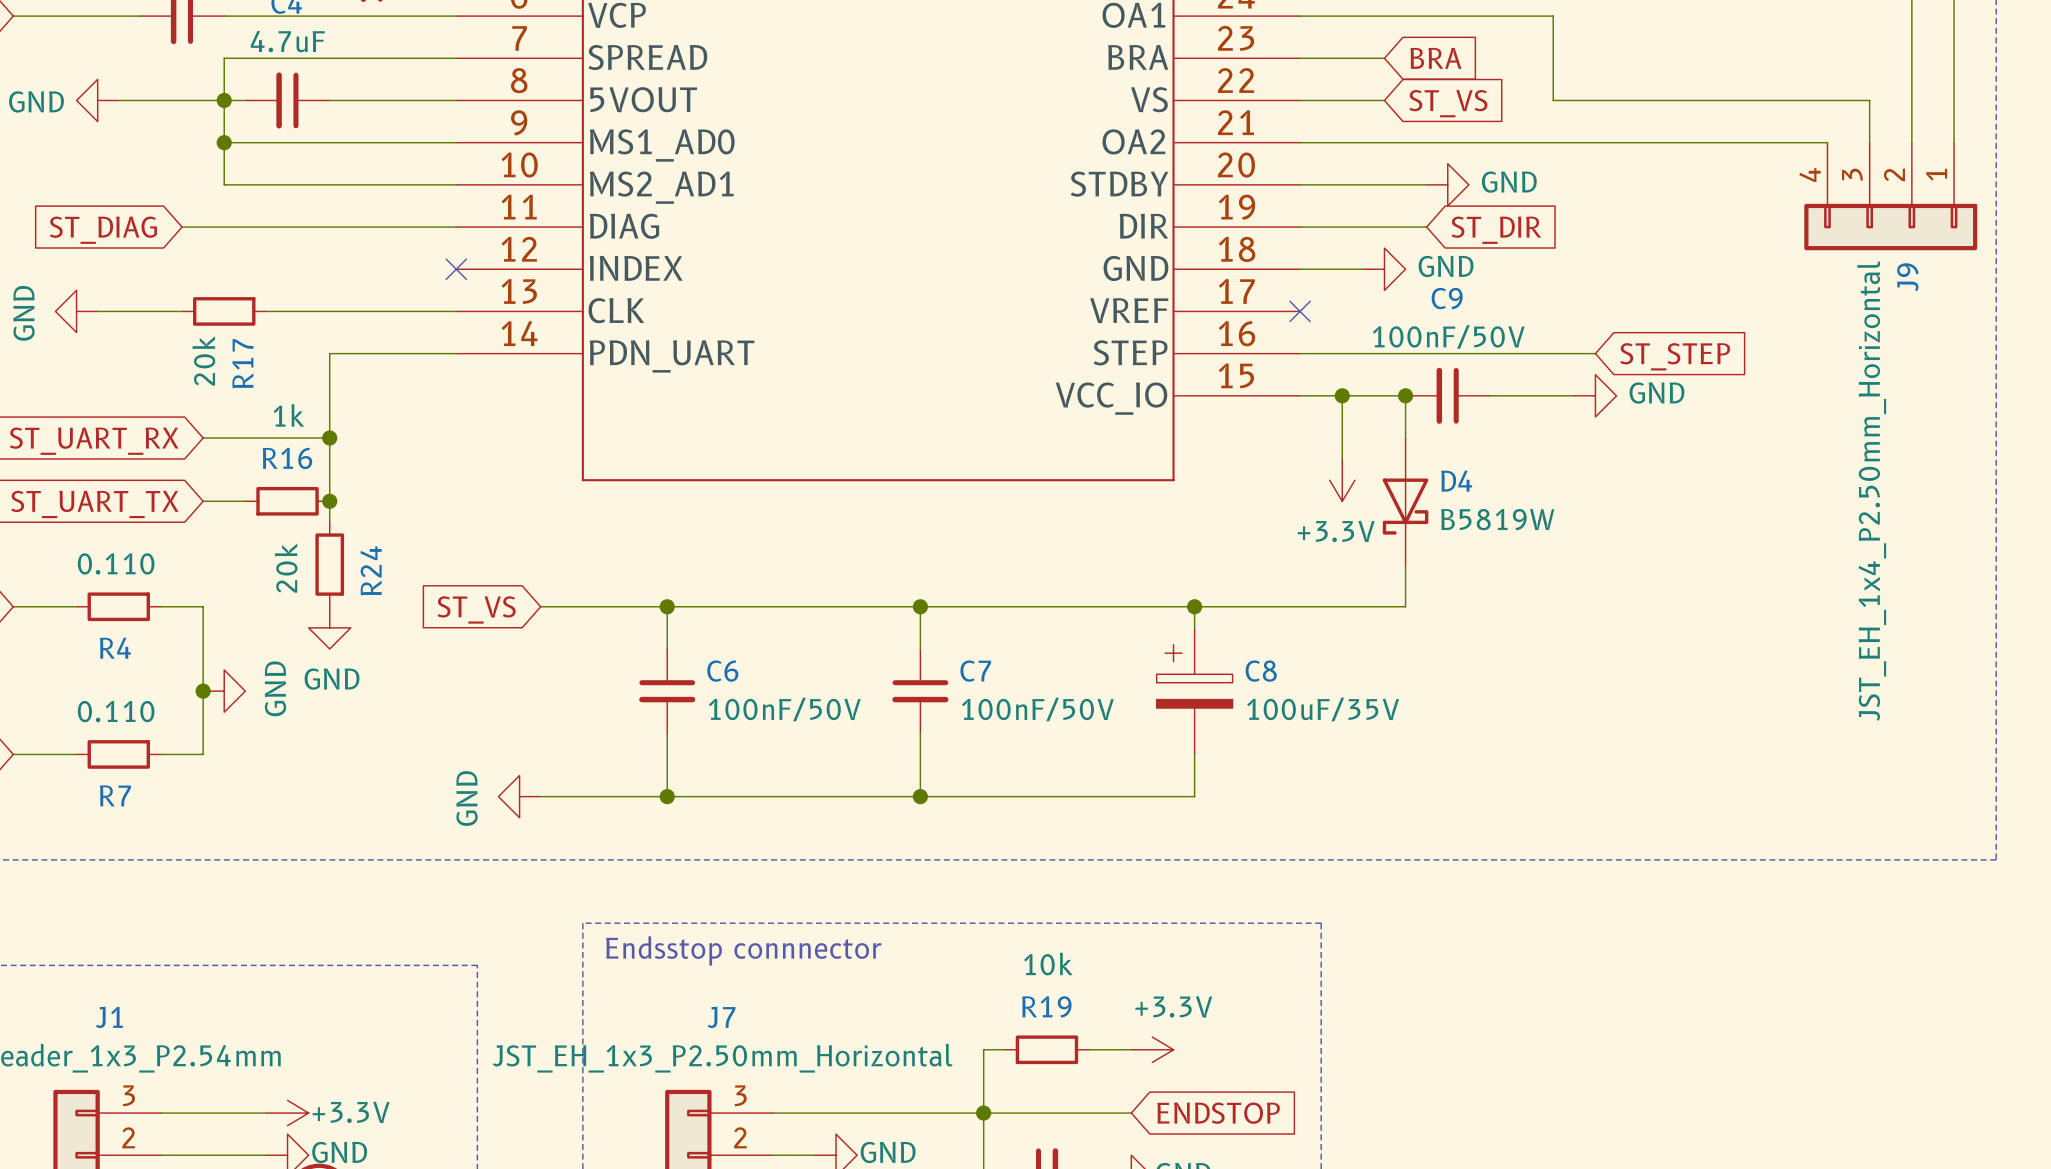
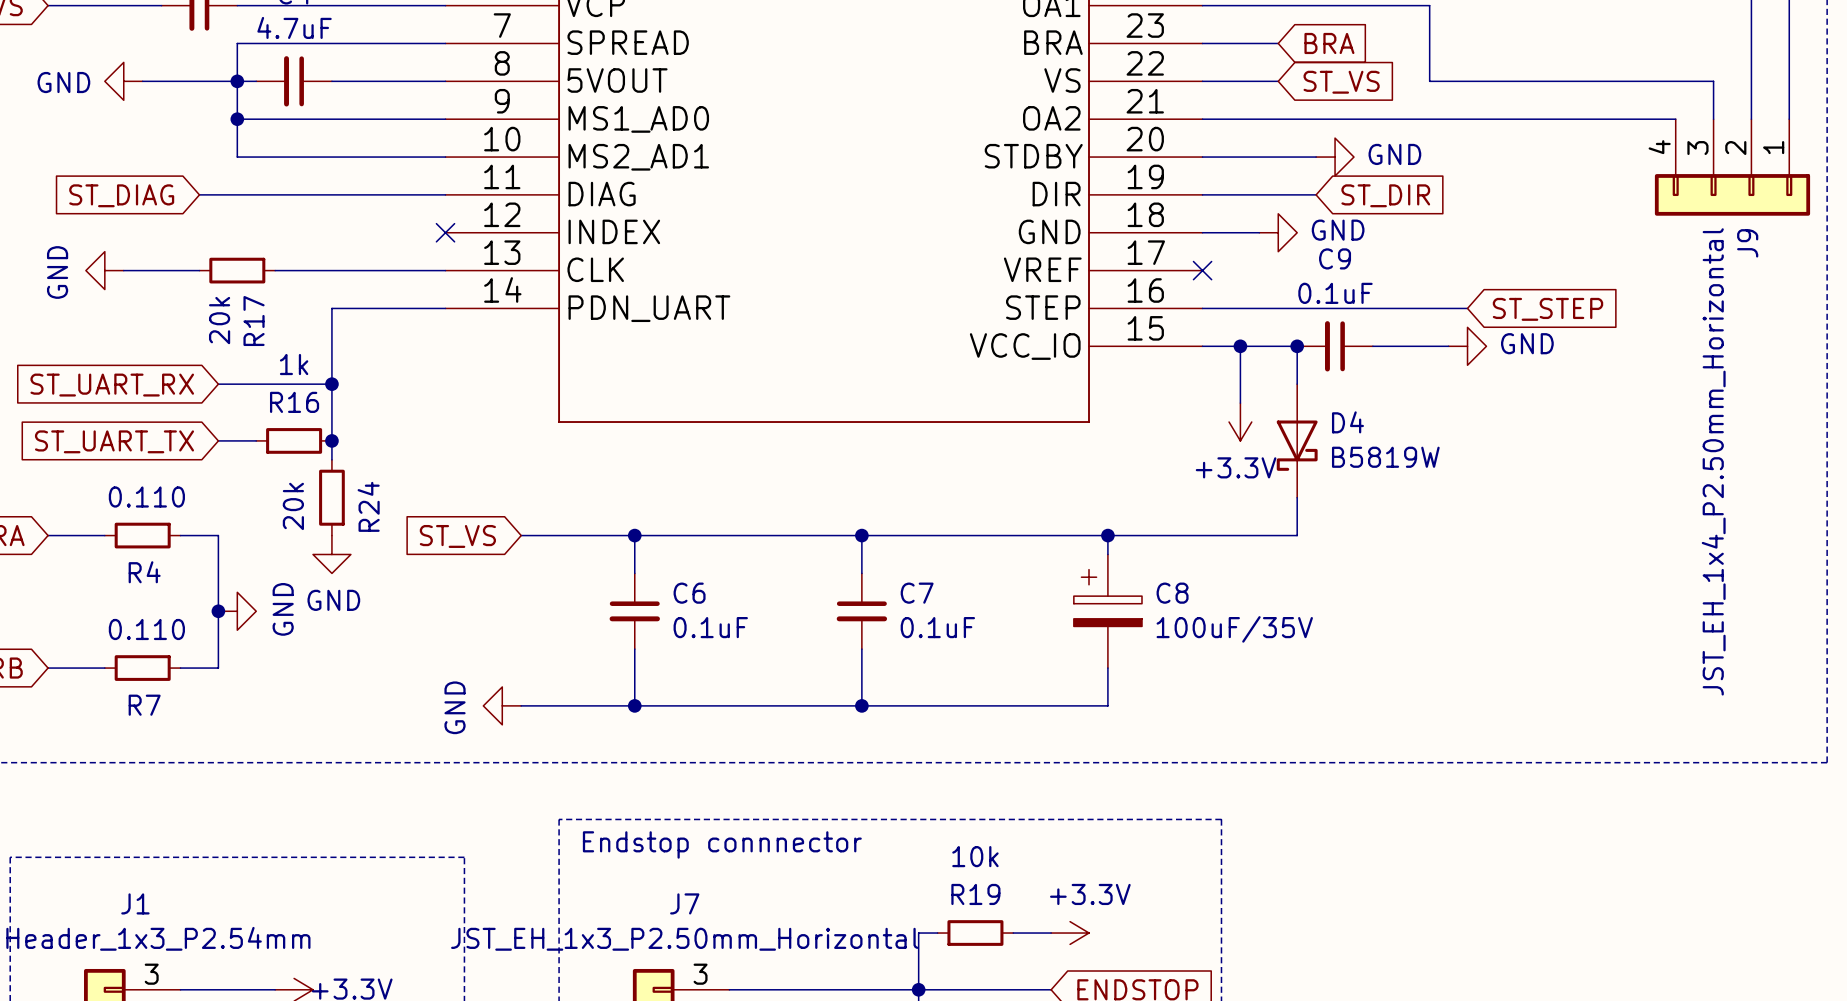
C9 value: 100nF/50V (1448, 336) -> 0.1uF (1335, 293)
C6 value: 100nF/50V (784, 709) -> 0.1uF (710, 627)
C7 value: 100nF/50V (1037, 709) -> 0.1uF (937, 627)
text: Endsstop connnector (743, 950) -> Endstop connnector (722, 844)

